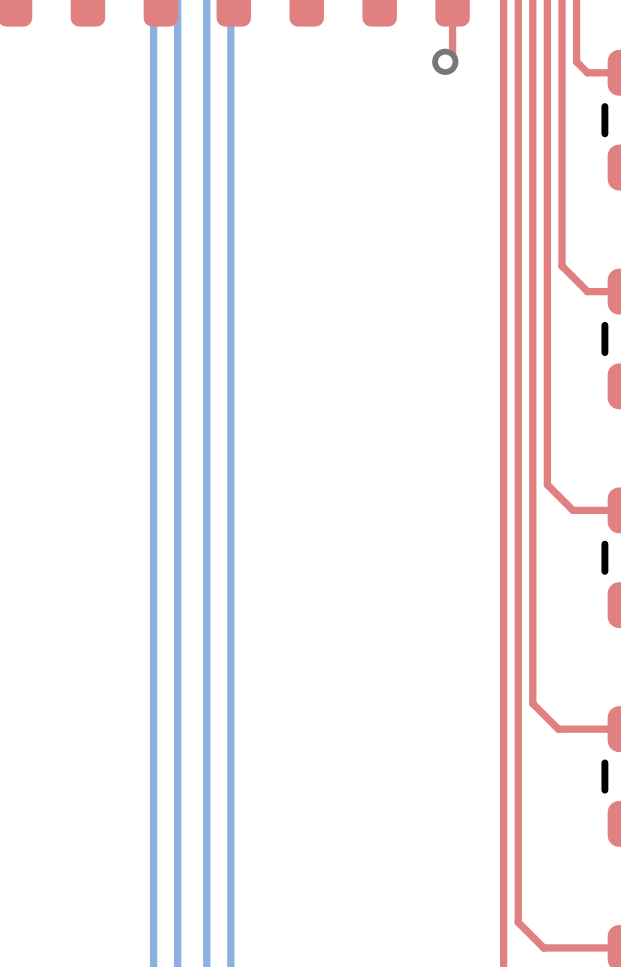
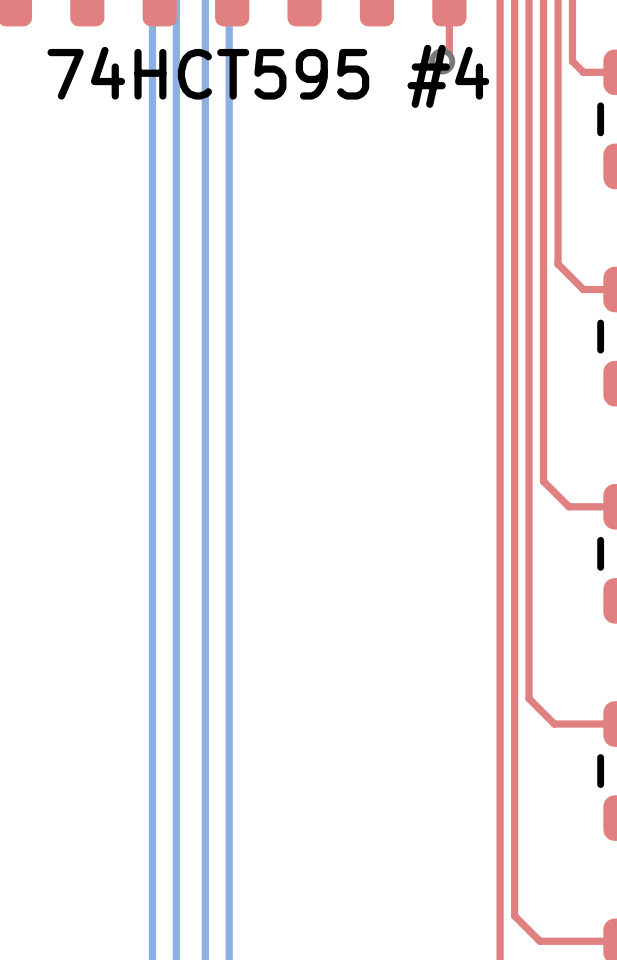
text: none -> 74HCT595 #4 (268, 76)

